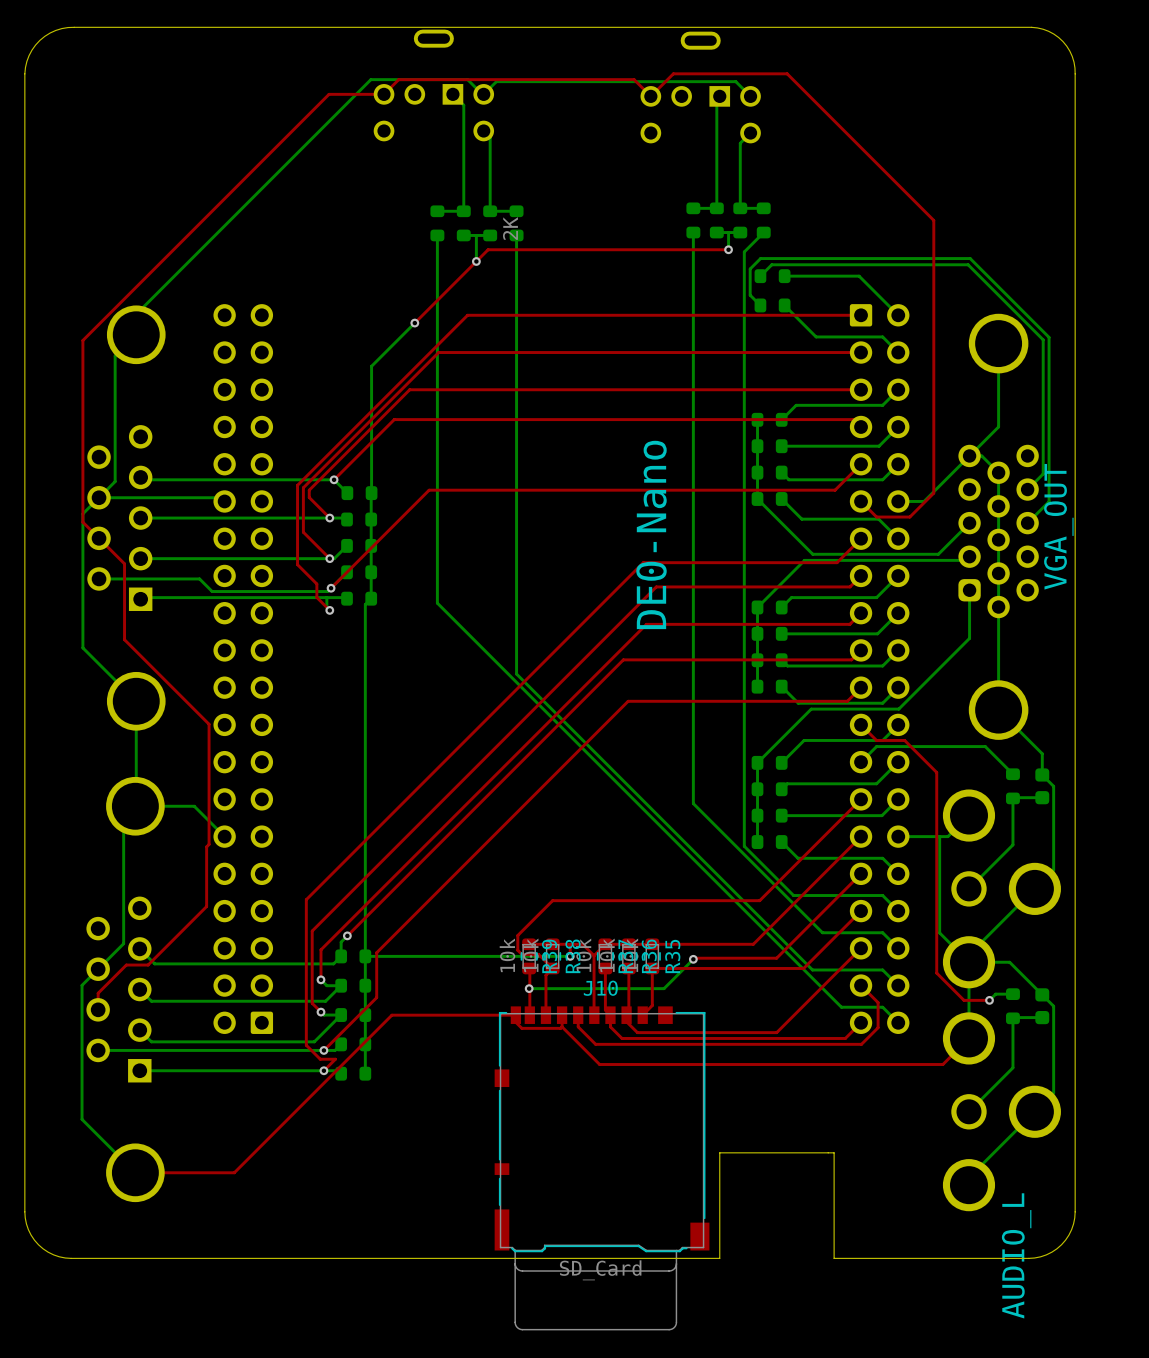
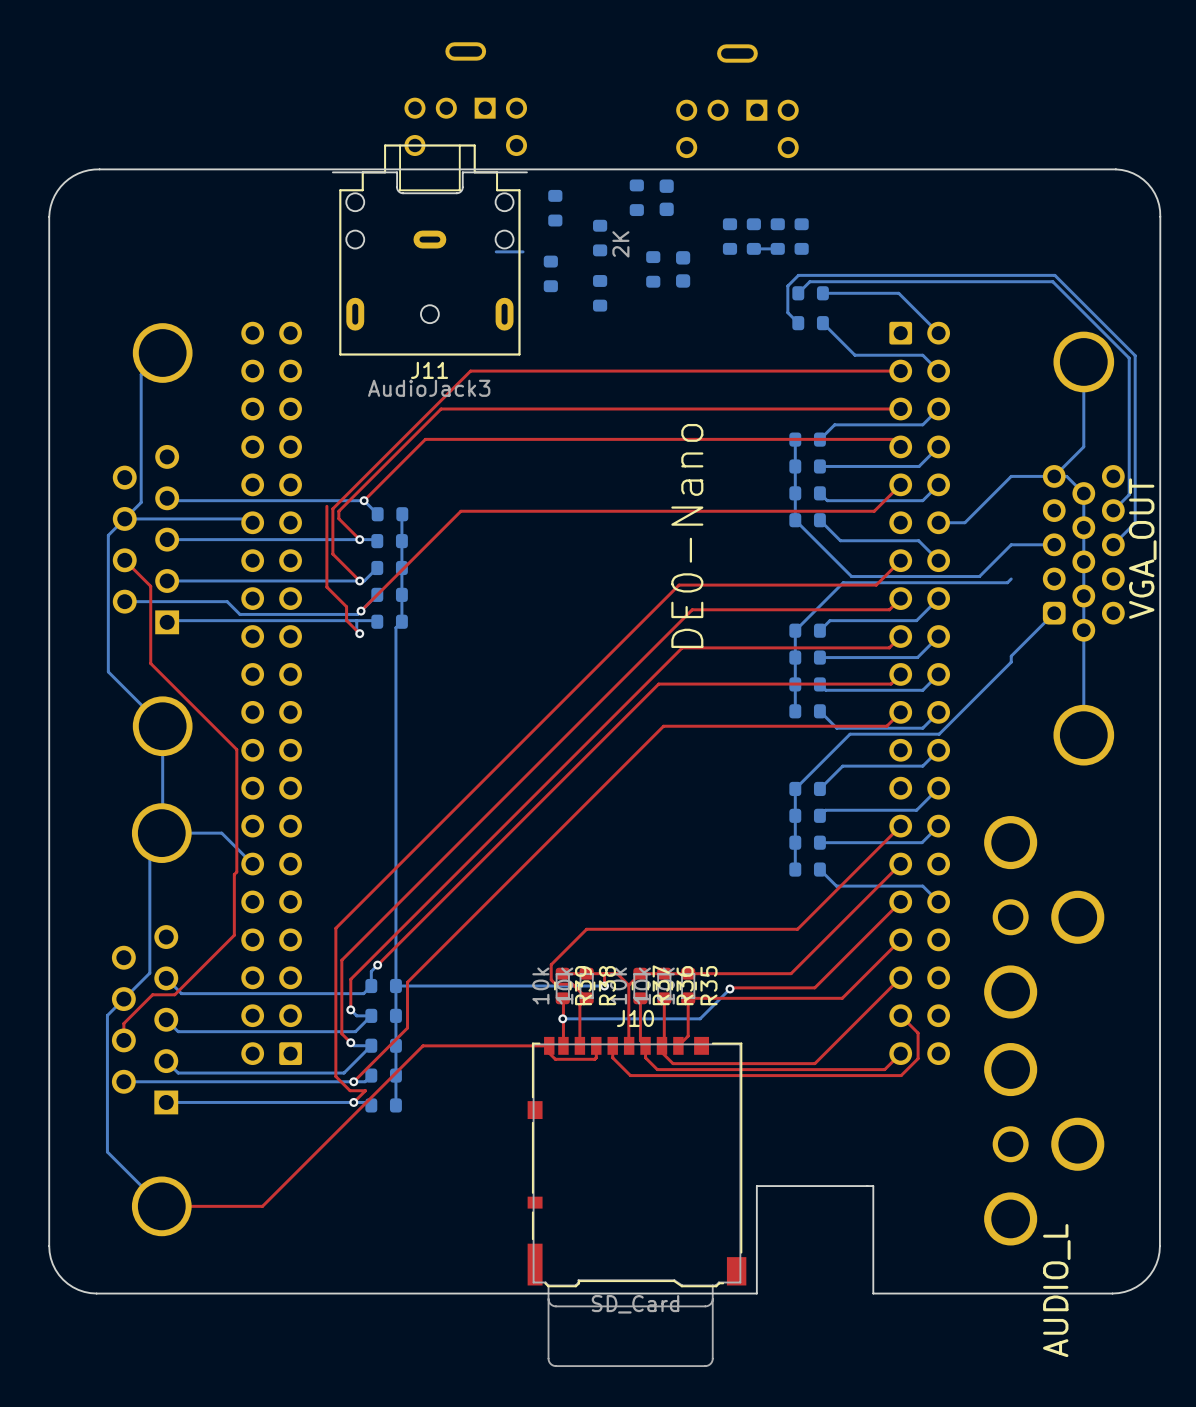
bottom track: (452, 94) (463, 105) (463, 211) (437, 211) -> none
bottom track: (719, 96) (716, 99) (716, 208) (693, 208) -> none
bottom track: (750, 96) (735, 81) (496, 81) (482, 94) (467, 79) (370, 79) (136, 314) (136, 334) -> none
bottom track: (483, 131) (490, 137) (490, 211) (516, 211) -> none
bottom track: (750, 133) (740, 143) (740, 208) (763, 208) -> none
part: none -> (636, 197)
part: none -> (666, 197)
part: none -> (555, 208)
board edge: (24, 201) (24, 73) (26, 61) (32, 50) (39, 40) (50, 33) (68, 27) (1031, 27) (1048, 31) (1063, 41) (1072, 56) (1075, 73) (1075, 1211) (1071, 1229) (1061, 1244) (1046, 1254) (1028, 1258) -> (49, 216) (54, 195) (64, 182) (78, 173) (94, 169) (1115, 169) (1133, 173) (1147, 183) (1157, 199) (1160, 216) (1159, 1252) (1156, 1264) (1150, 1274) (1141, 1283) (1130, 1289) (1112, 1293) (1071, 1293)
part: (437, 223) -> none
part: (463, 223) -> none
part position: (490, 223) -> (600, 238)
part: (516, 223) -> none
bottom track: (693, 232) (693, 803) (822, 932) (882, 932) (898, 948) -> none
bottom track: (728, 232) (728, 249) -> none
bottom track: (763, 232) (744, 251) (744, 846) (793, 895) (882, 895) (898, 911) -> none
J11: none -> AudioJack3 (429, 250)
bottom track: (437, 235) (437, 603) (841, 1007) (882, 1007) (898, 1022) -> none
bottom track: (476, 235) (476, 261) -> none
bottom track: (516, 235) (516, 674) (812, 969) (882, 969) (898, 985) -> none
top track: (728, 249) (488, 249) (414, 323) -> none
via: (728, 249) -> none
part: none -> (653, 269)
part: none -> (683, 269)
part: none -> (550, 273)
bottom track: (970, 258) (1049, 337) (1049, 501) (1027, 523) -> (1011, 275) (1054, 275) (1135, 355) (1135, 522) (1113, 544)
via: (476, 261) -> none
bottom track: (968, 264) (1043, 339) (1043, 473) (1027, 489) -> (1009, 281) (1052, 281) (1129, 358) (1129, 494) (1113, 510)
part: none -> (600, 293)
top track: (861, 315) (467, 315) (297, 485) -> none
bottom track: (414, 323) (371, 366) (371, 493) -> none
via: (414, 323) -> none
bottom track: (998, 343) (998, 426) (969, 455) -> (1083, 361) (1083, 446) (1054, 476)
bottom track: (981, 455) (998, 472) (998, 710) (1042, 753) (1042, 774) (1053, 786) (1053, 870) (968, 954) (968, 1038) -> (1023, 476) (1066, 476) (1083, 493) (1083, 735)
top track: (861, 501) (876, 517) (909, 517) (933, 493) (933, 220) (787, 73) (673, 73) (650, 96) (634, 79) (398, 79) (384, 94) (329, 94) (82, 340) (82, 522) (99, 538) -> none
bottom track: none -> (1011, 544) (1054, 544)
part position: (998, 526) -> (1083, 548)
bottom track: (969, 590) (969, 632) -> (1054, 613) (1011, 656)
top track: (861, 724) (876, 740) (904, 740) (936, 772) (936, 973) (964, 1000) (989, 1000) -> none
bottom track: (861, 762) (876, 746) (985, 746) (1012, 774) -> none
part: (1012, 786) -> none
part: (1042, 786) -> none
bottom track: (1042, 797) (1012, 798) (1012, 844) (968, 888) -> none
bottom track: (968, 815) (947, 836) (898, 836) -> none
bottom track: (939, 836) (939, 932) (968, 962) (1009, 962) (1053, 1006) (1053, 1093) (968, 1177) (968, 1185) -> none
bottom track: (1012, 994) (995, 994) (989, 1000) -> none
via: (989, 1000) -> none
part: (1012, 1006) -> none
part: (1042, 1006) -> none
bottom track: (1042, 1017) (1012, 1018) (1012, 1067) (968, 1111) -> none
top track: (562, 1026) (599, 1064) (942, 1064) (968, 1038) -> none

